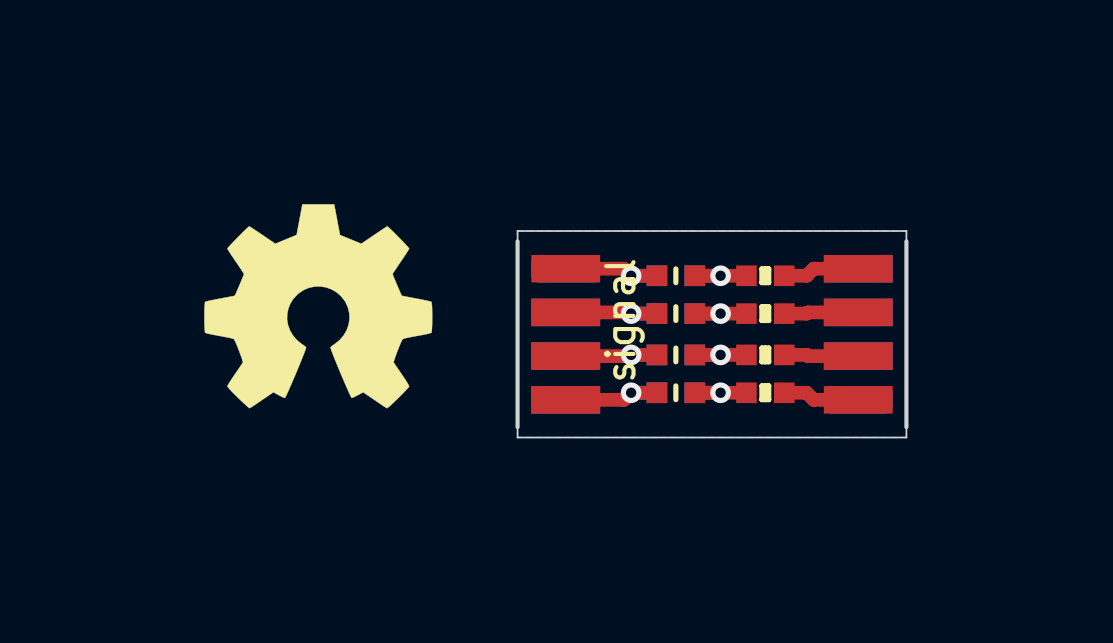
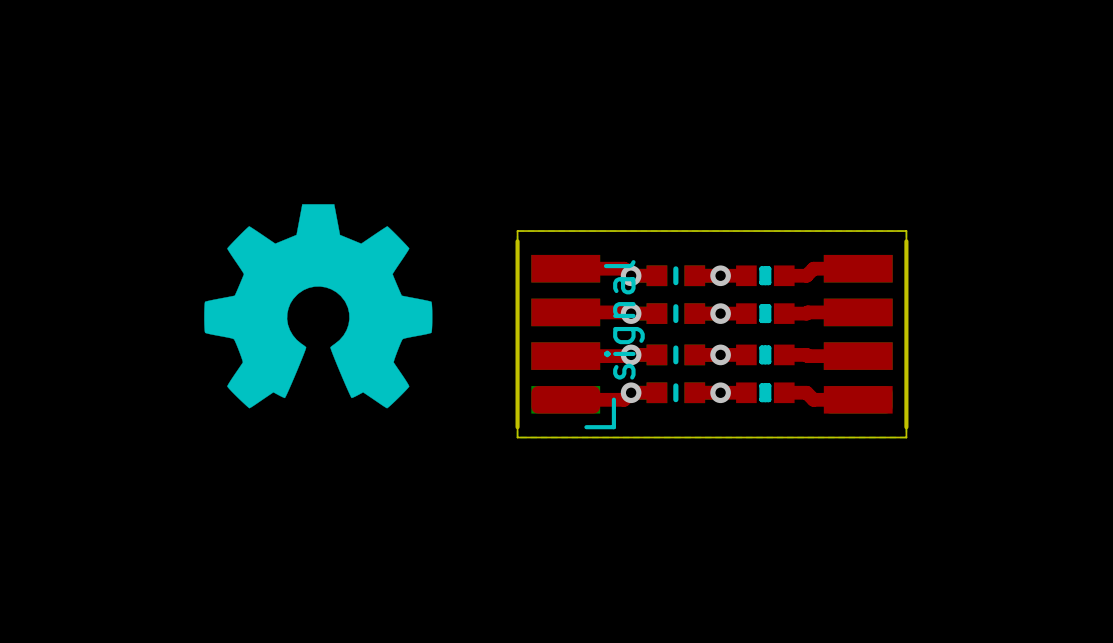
part side: top (557, 334) -> bottom (565, 334)

